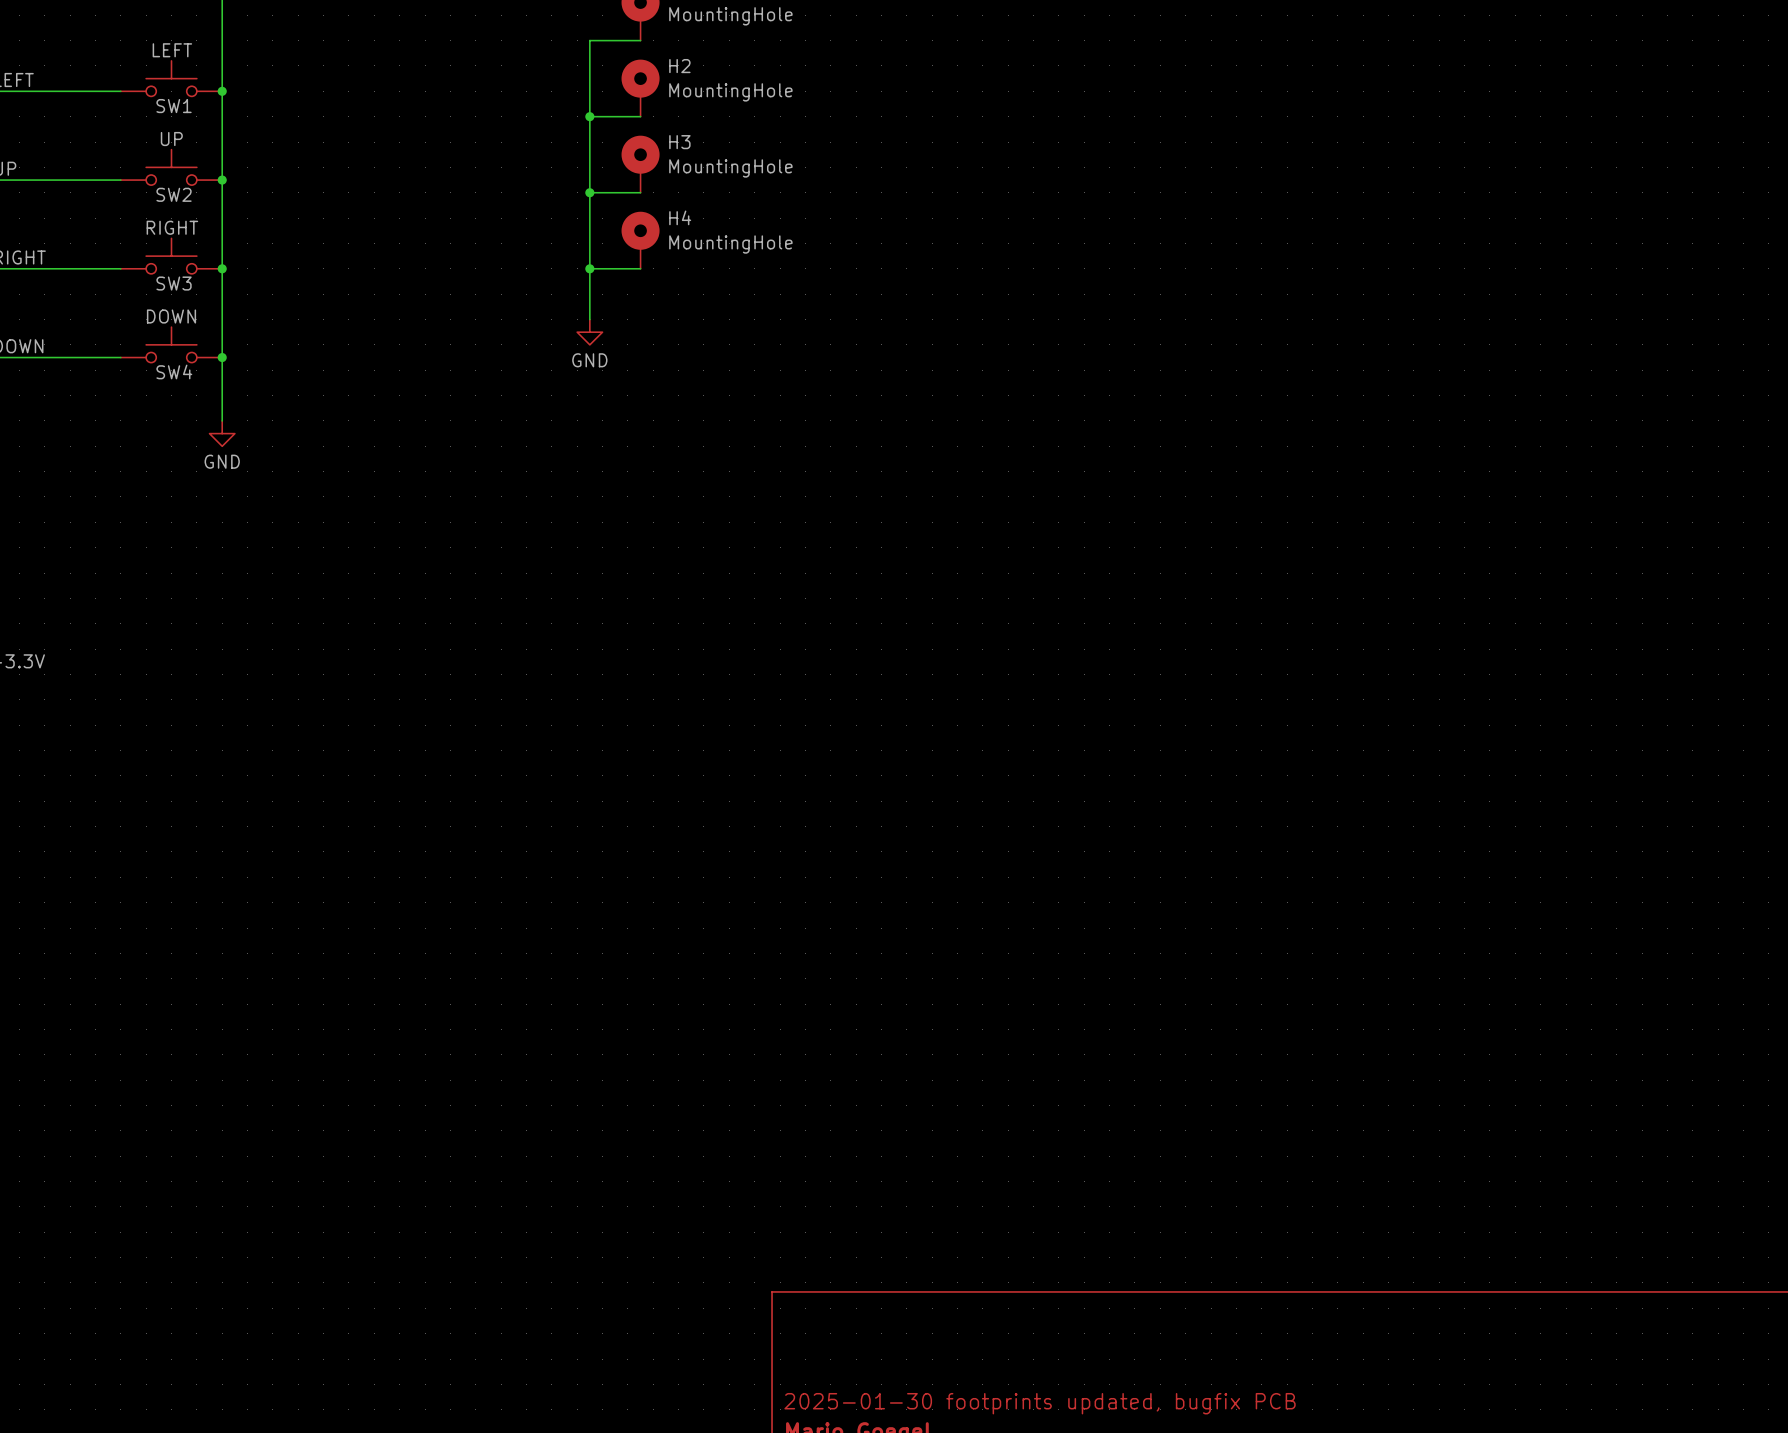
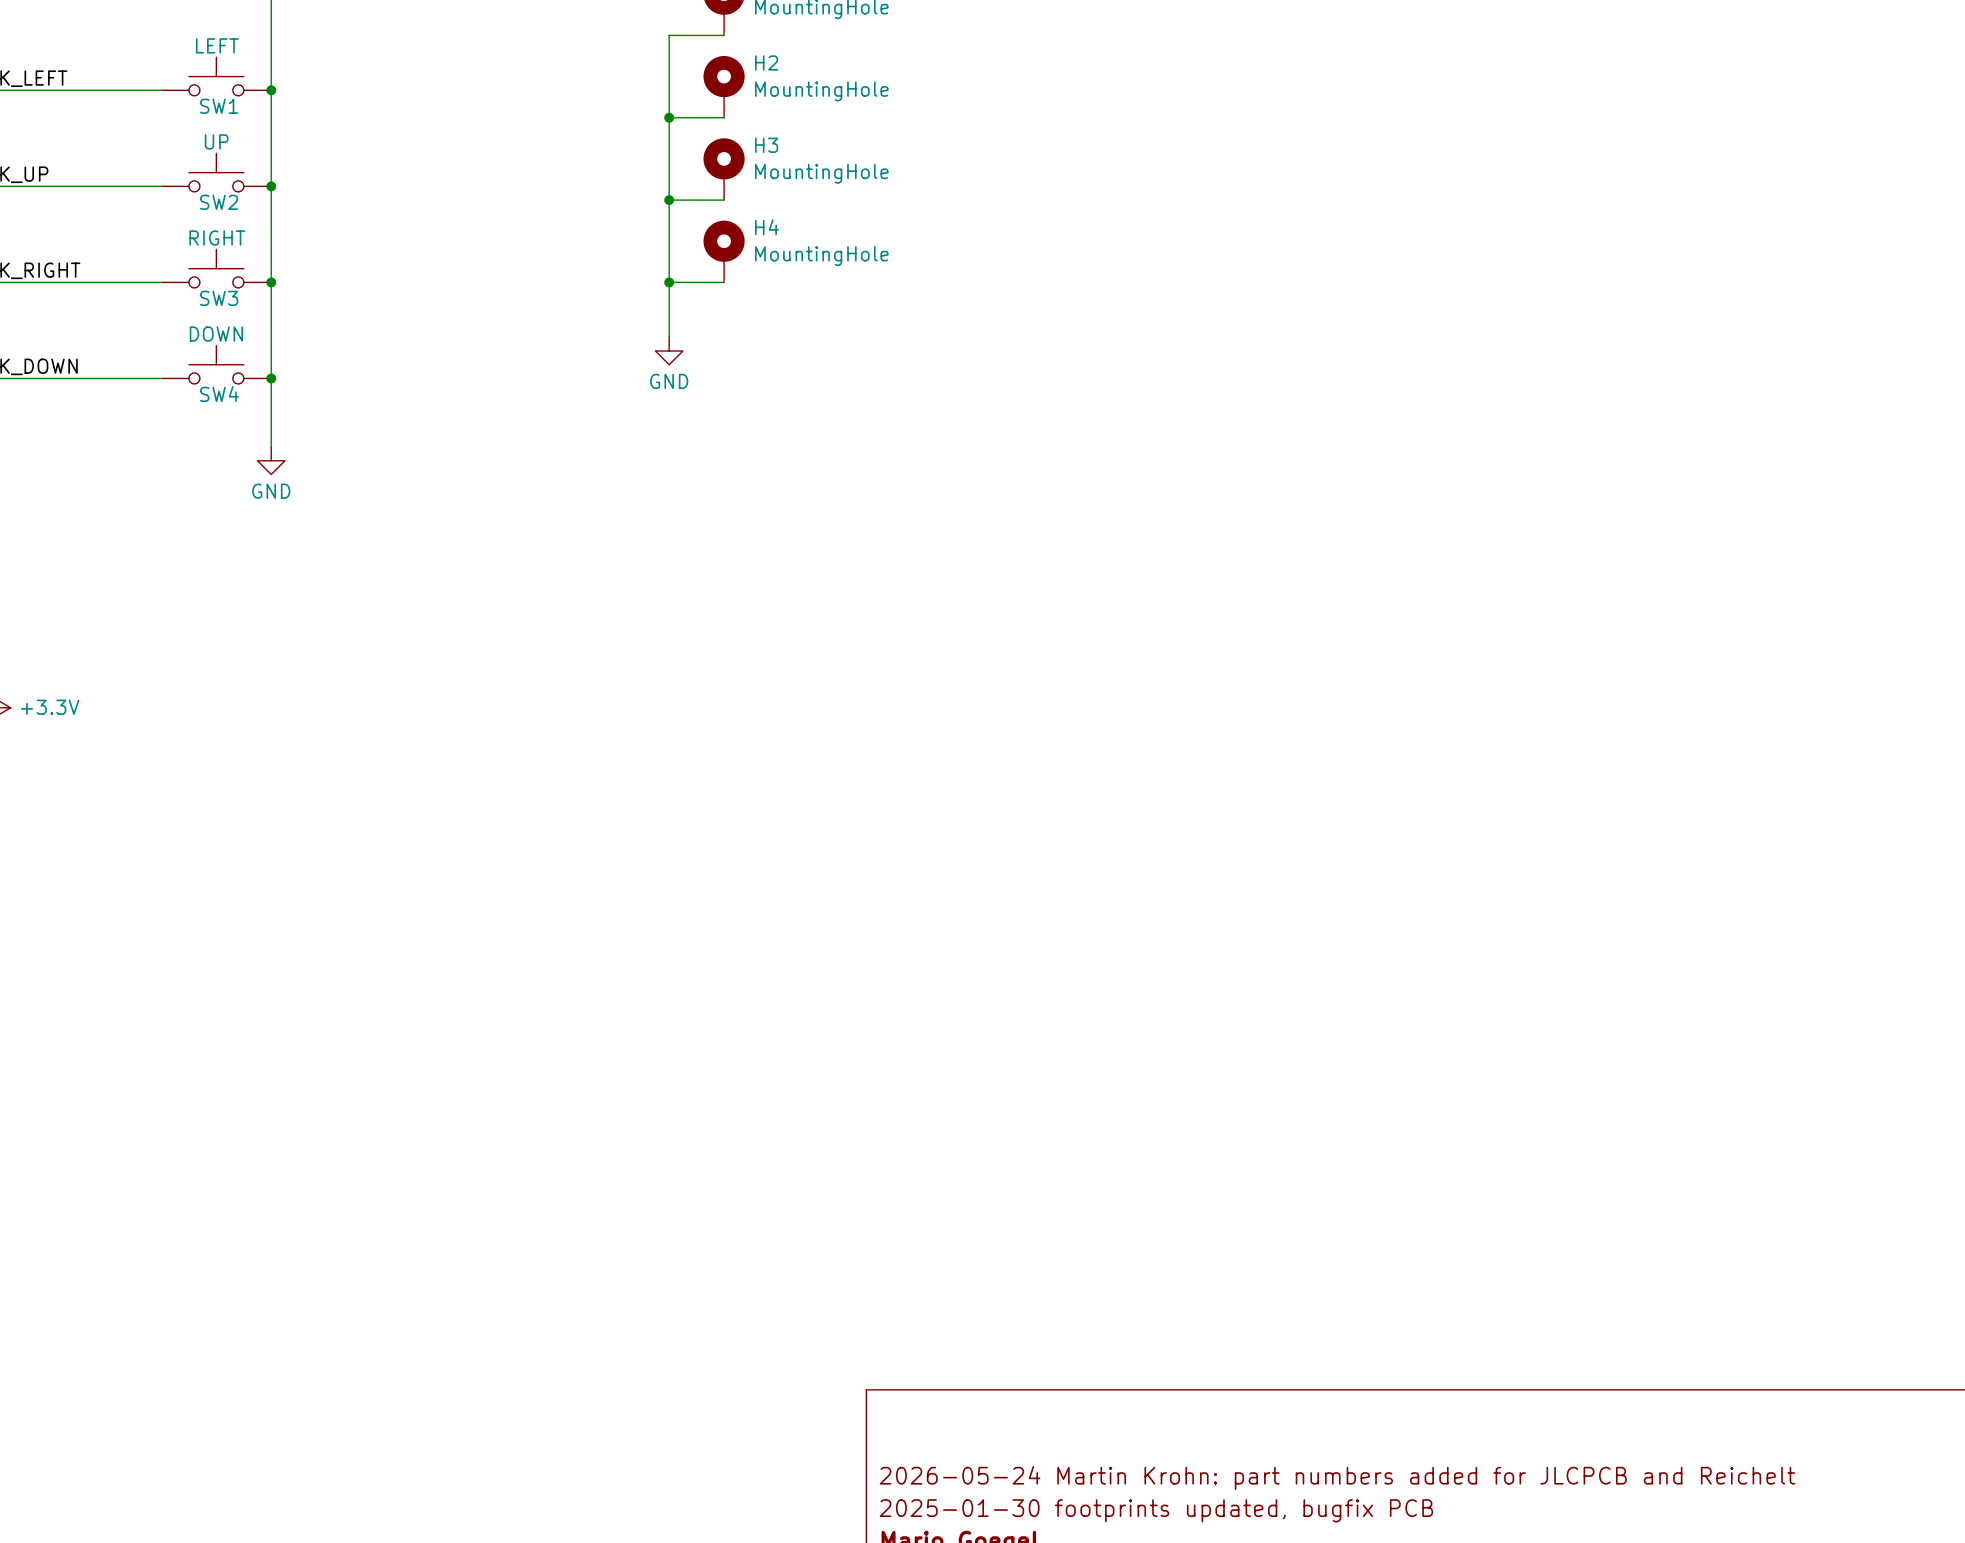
title block: none -> 2026-05-24 Martin Krohn: part numbers added for JLCPCB and Reichelt (1337, 1478)

